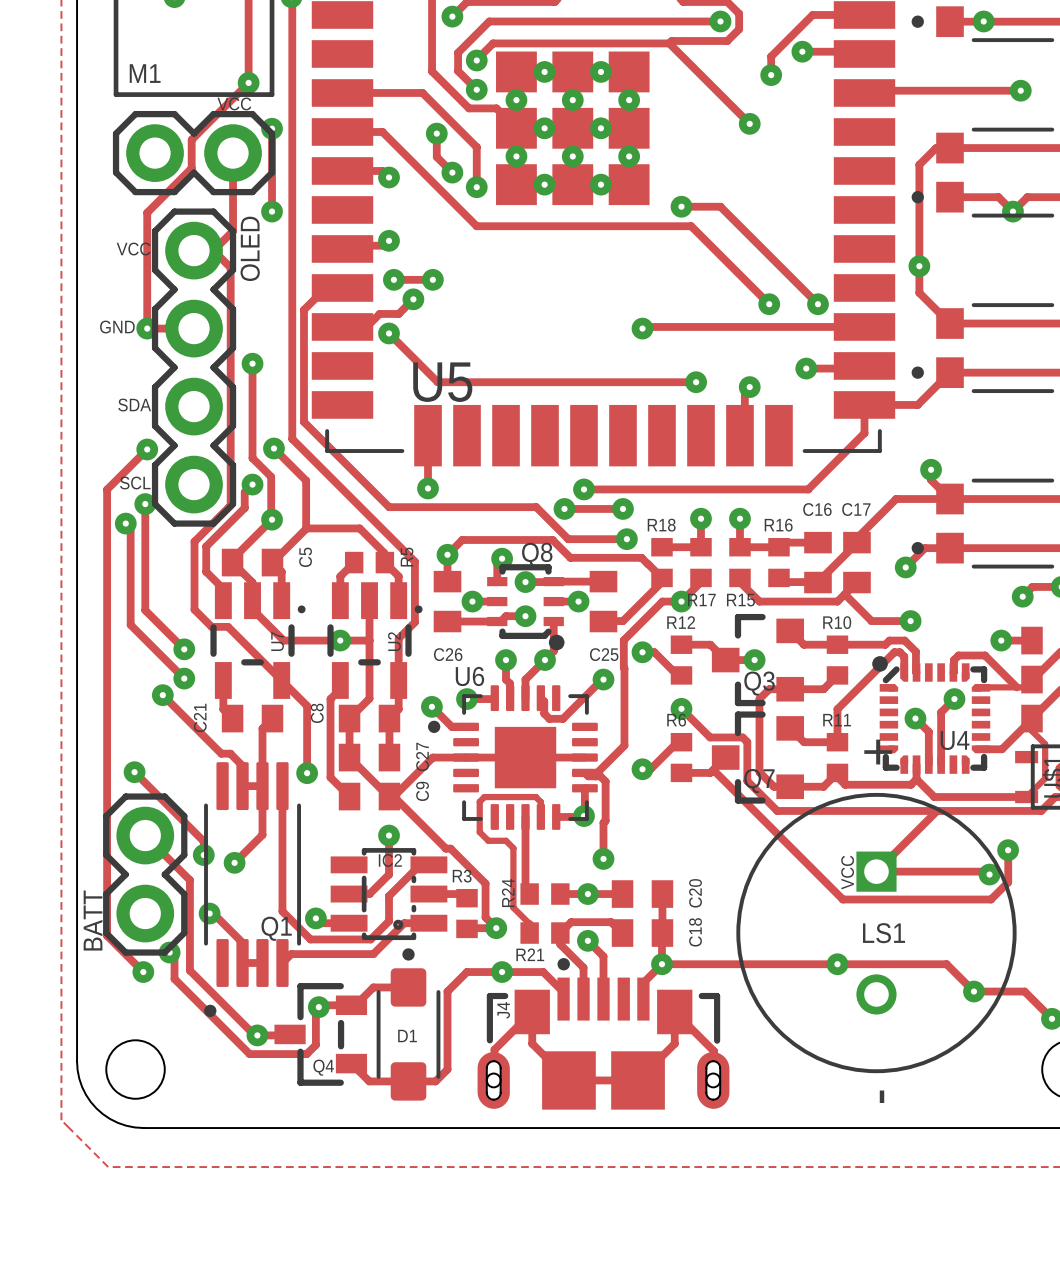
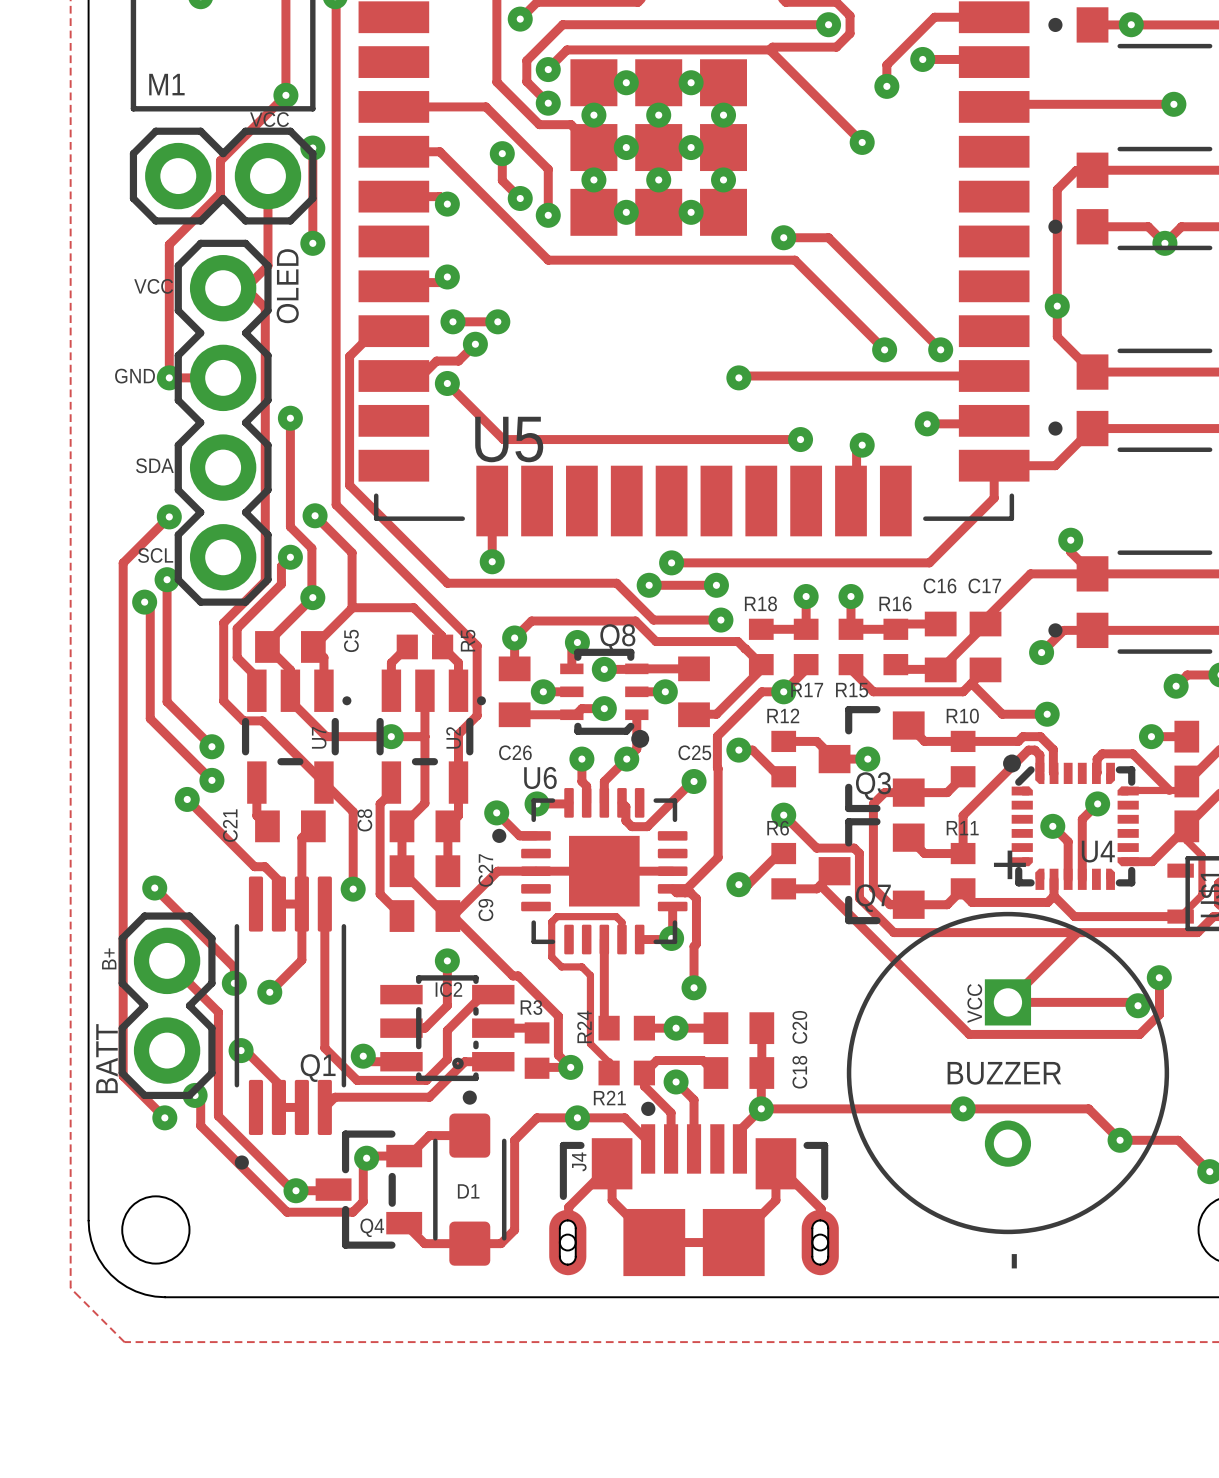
text: none -> B+ (109, 958)
LS1 name: LS1 (884, 933) -> BUZZER (1004, 1073)

